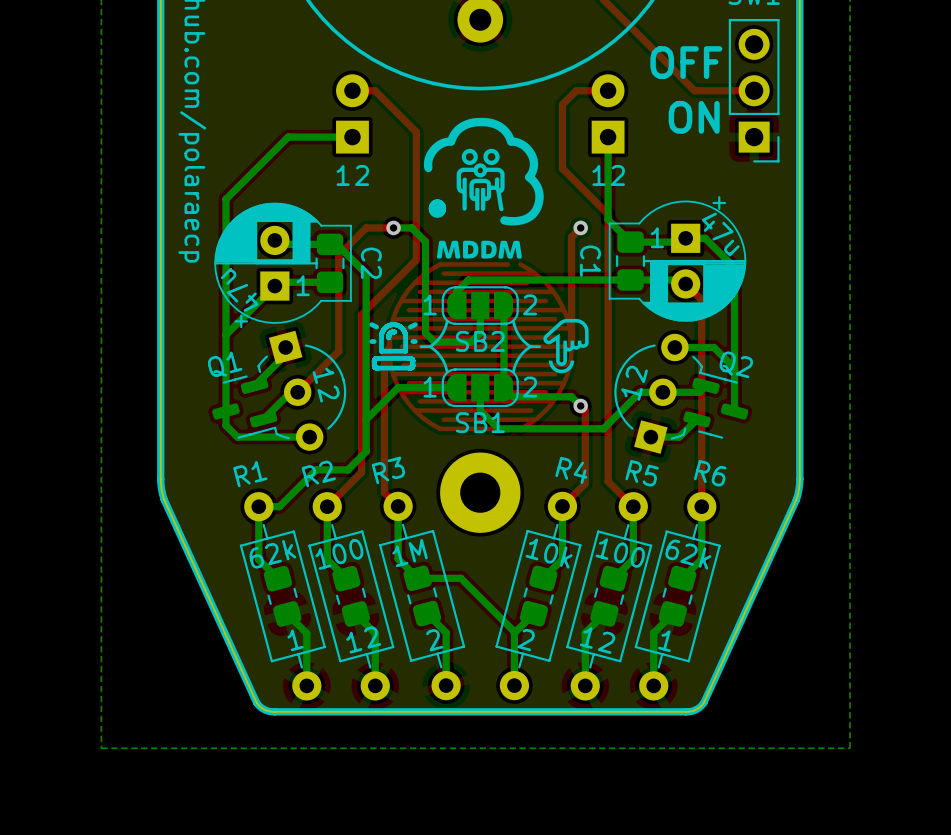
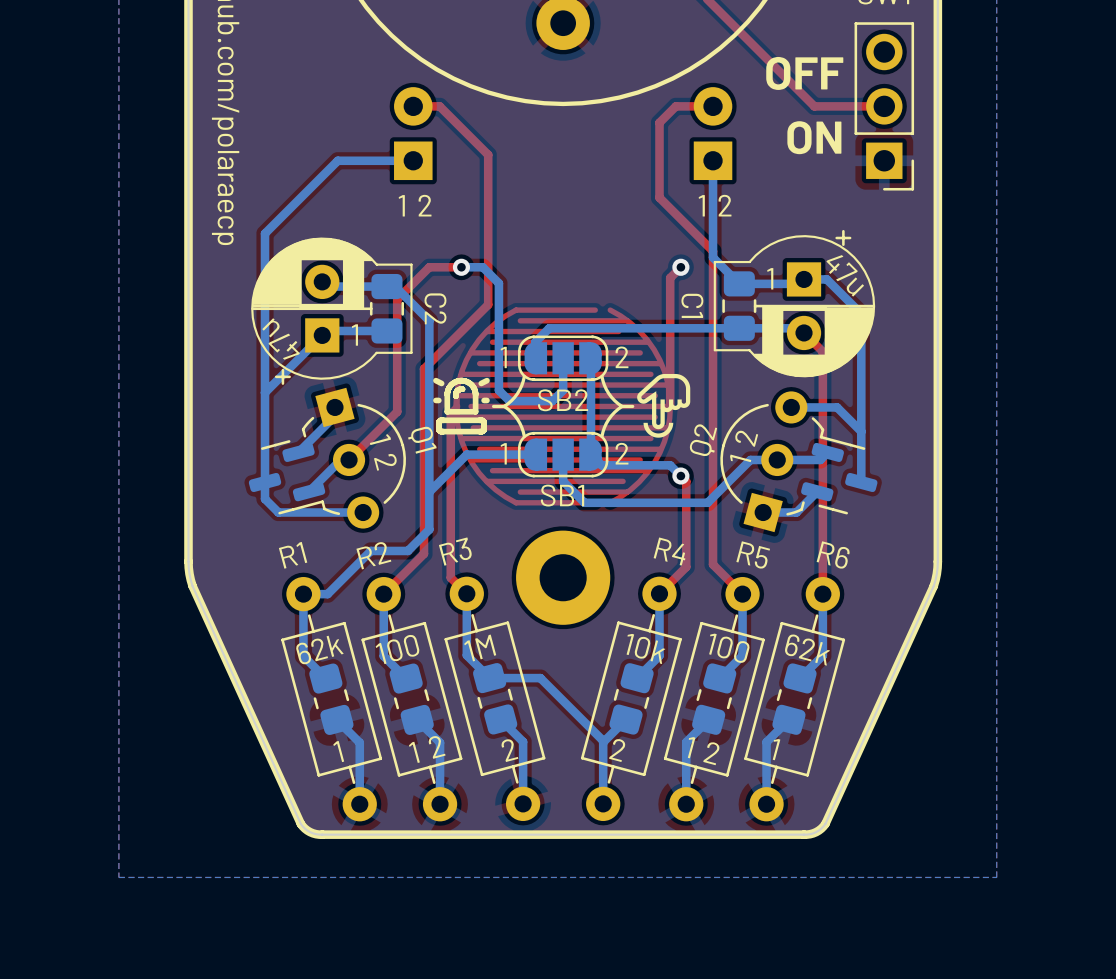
drawing: [423, 117, 544, 259] -> none
Q1 name rotation: 0° (225, 364) -> 90° clockwise (422, 440)
Q1 name position: Q1 (225, 364) -> Q1 (422, 440)
Q2 name rotation: 0° (736, 364) -> 90° counterclockwise (703, 440)
Q2 name position: Q2 (736, 364) -> Q2 (703, 440)

